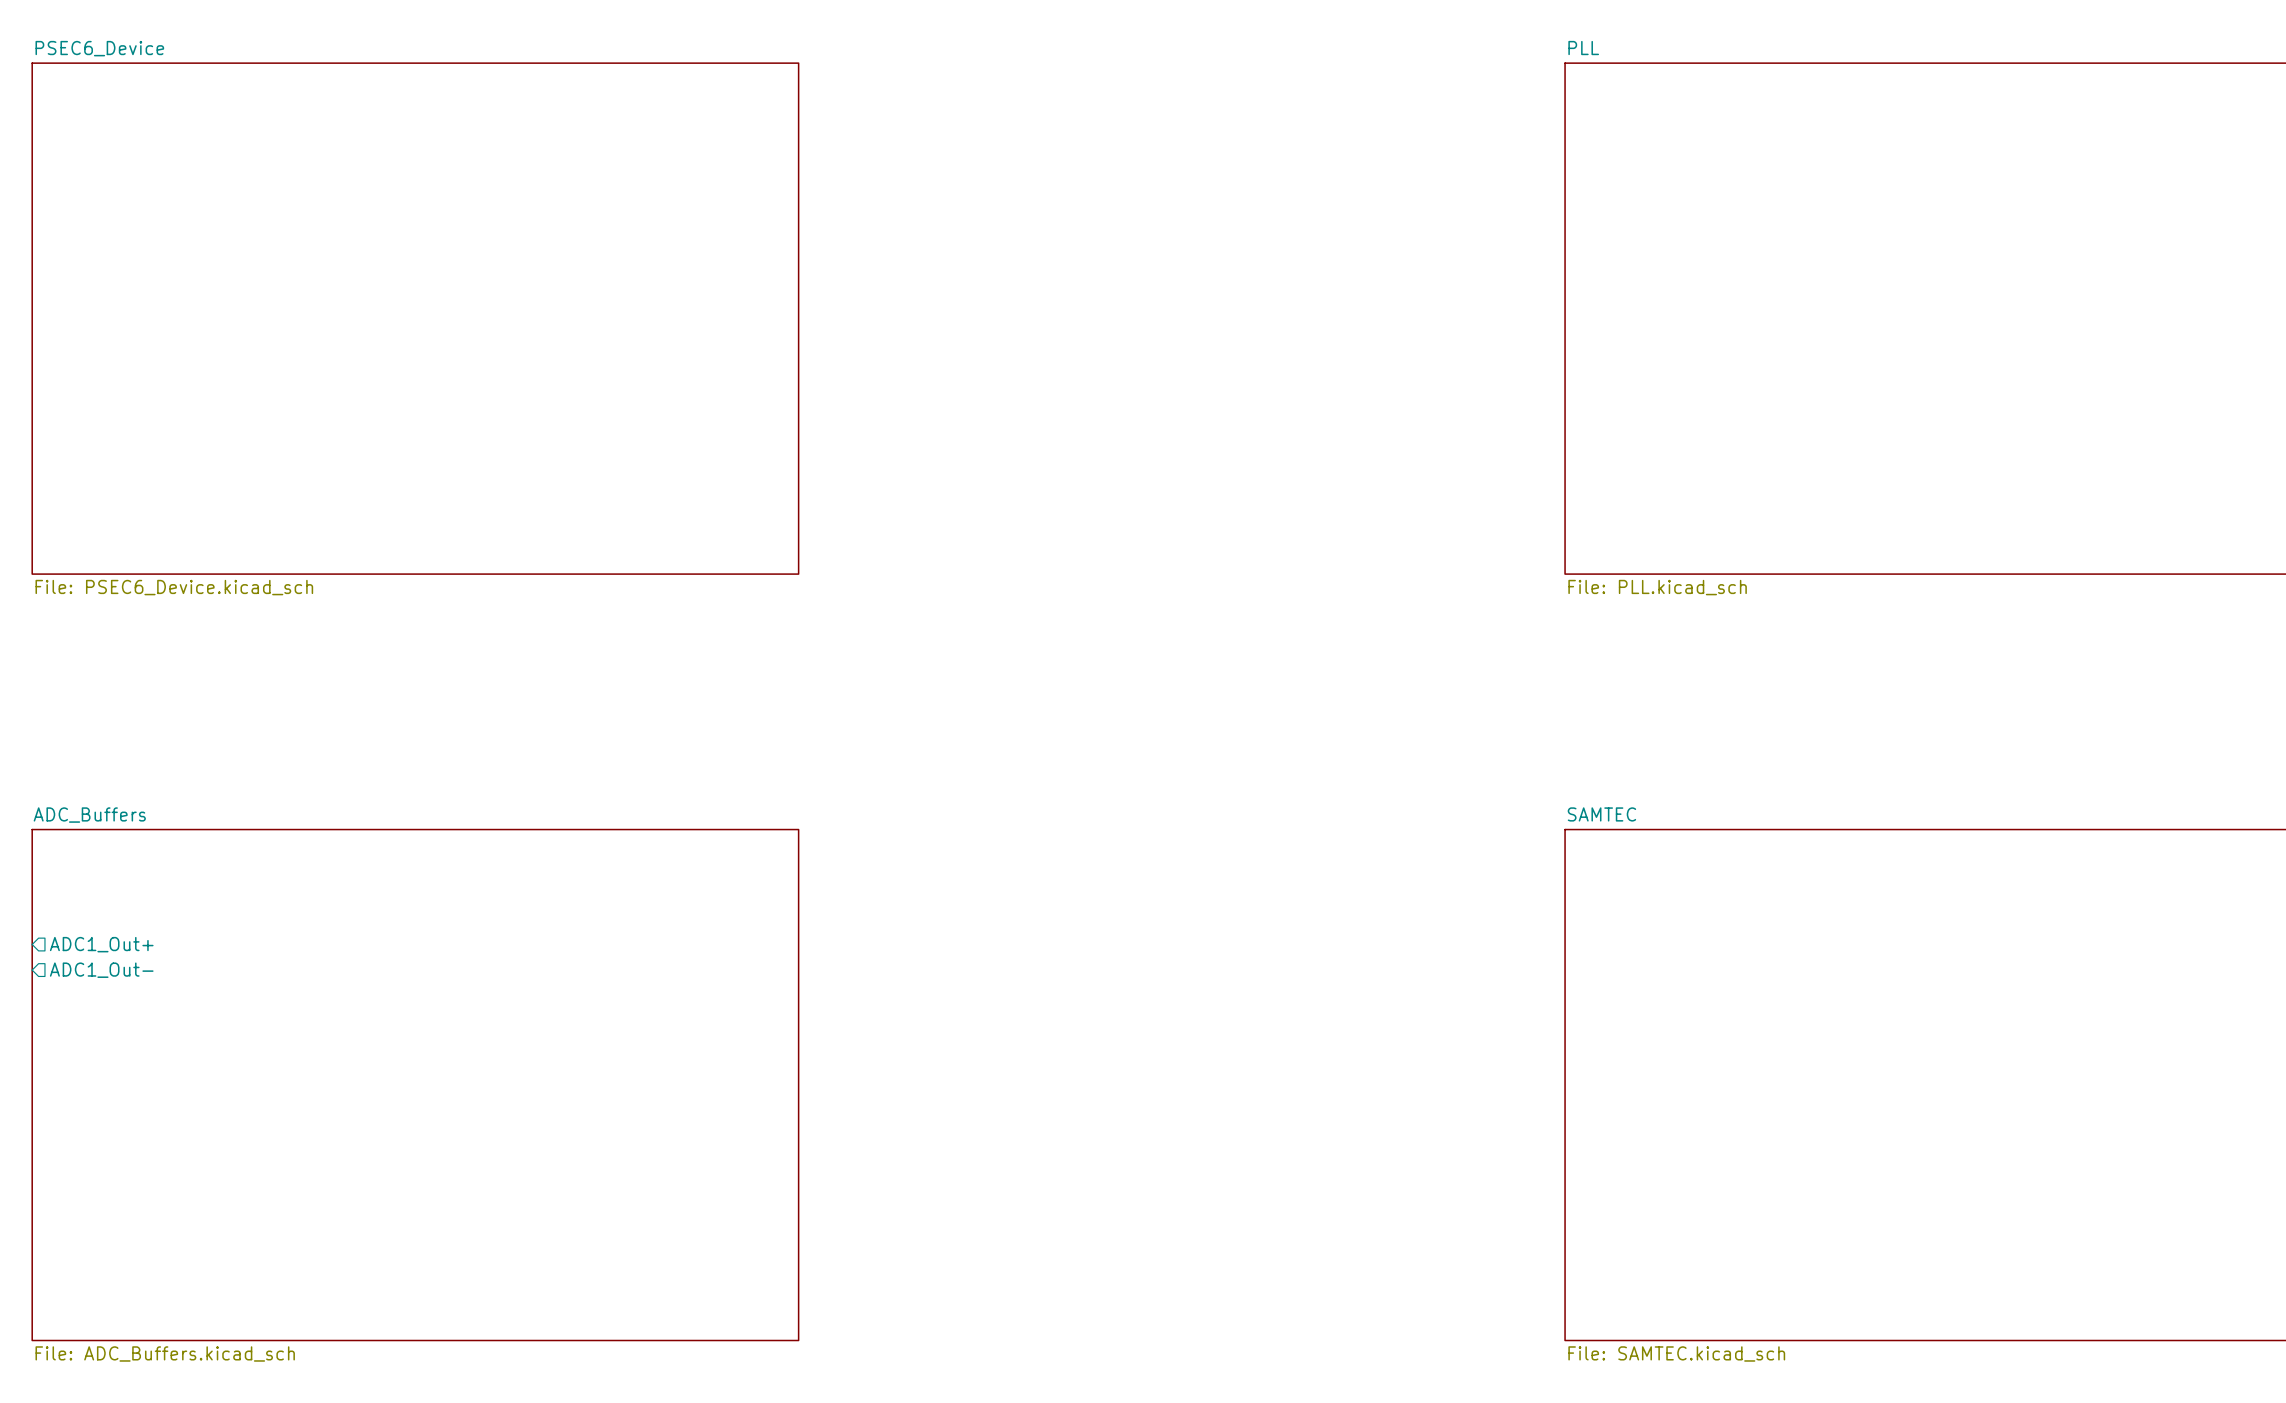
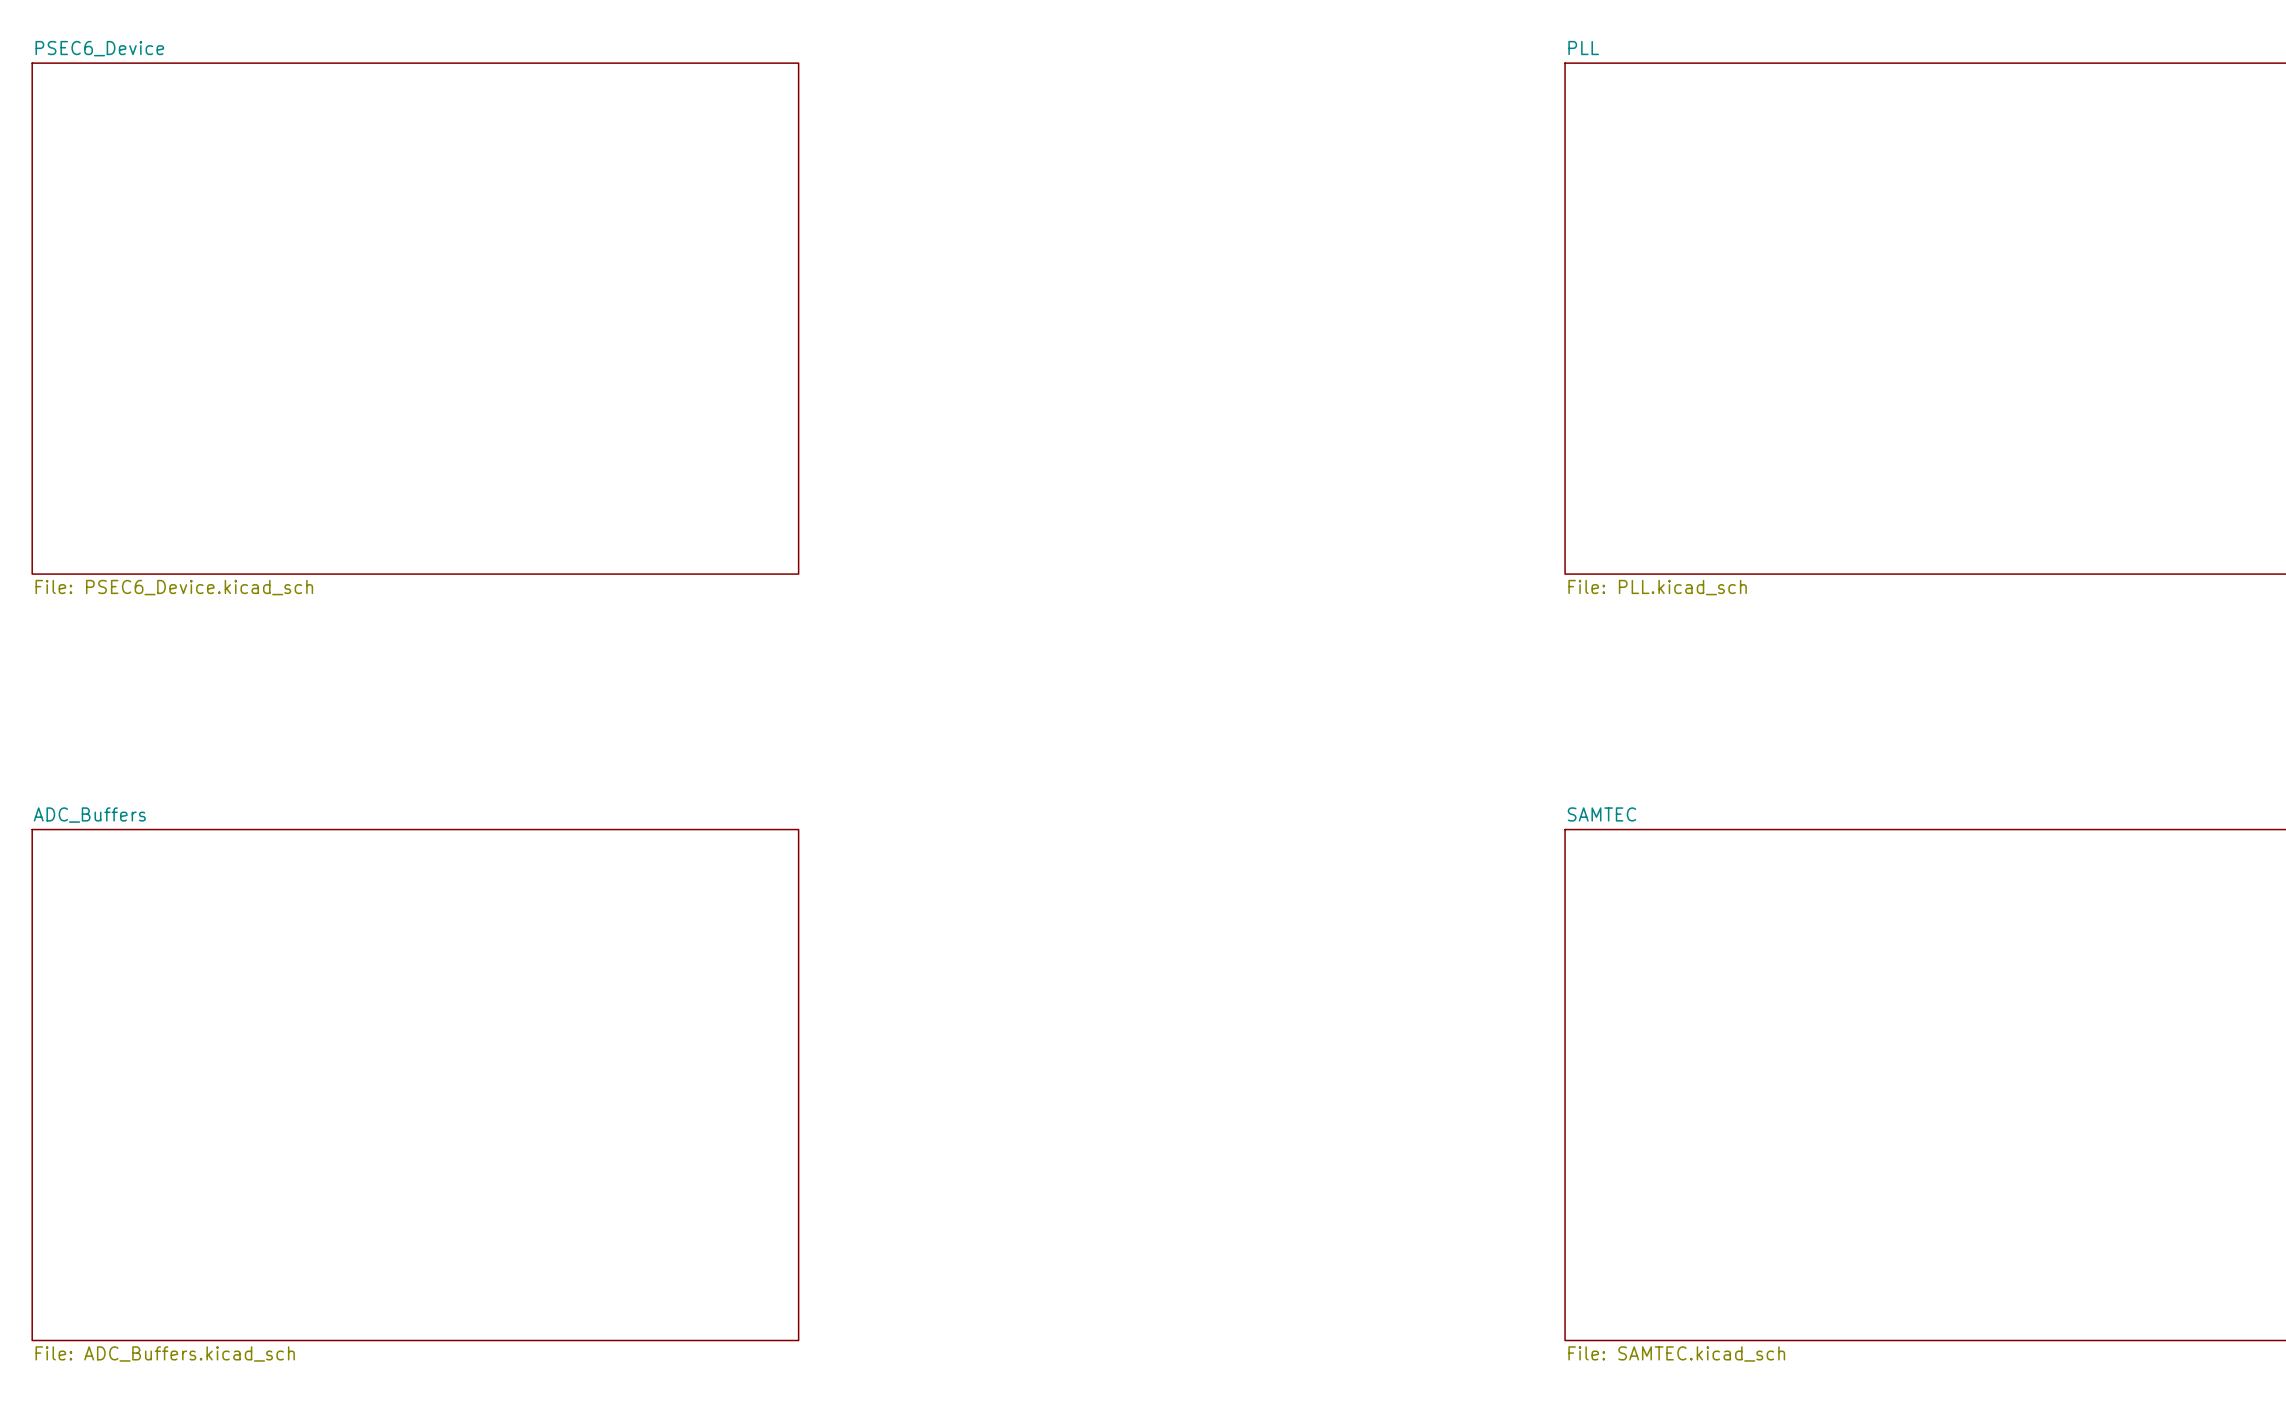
sheet pin: ADC1_Out+ (101, 944) -> none
sheet pin: ADC1_Out- (101, 970) -> none

